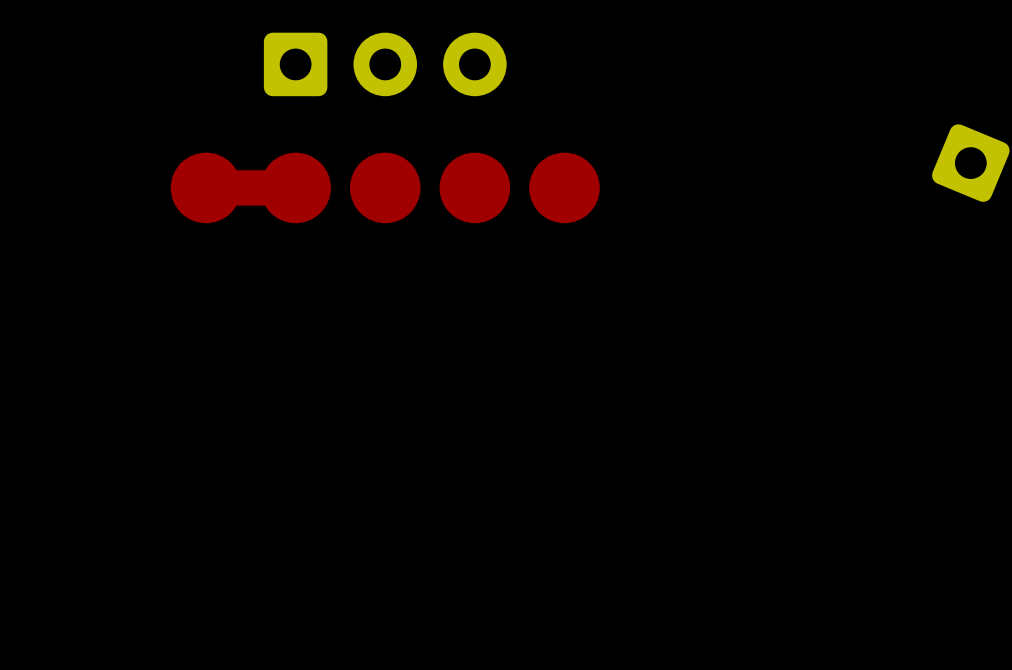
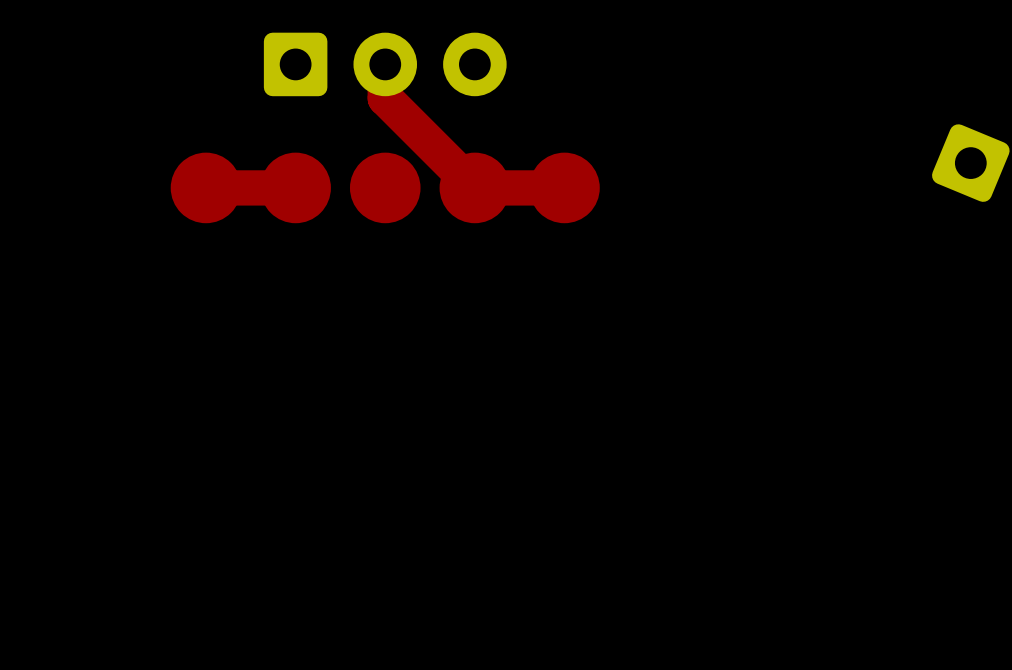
track: none -> (385, 64) (385, 98) (474, 187) (564, 187)

